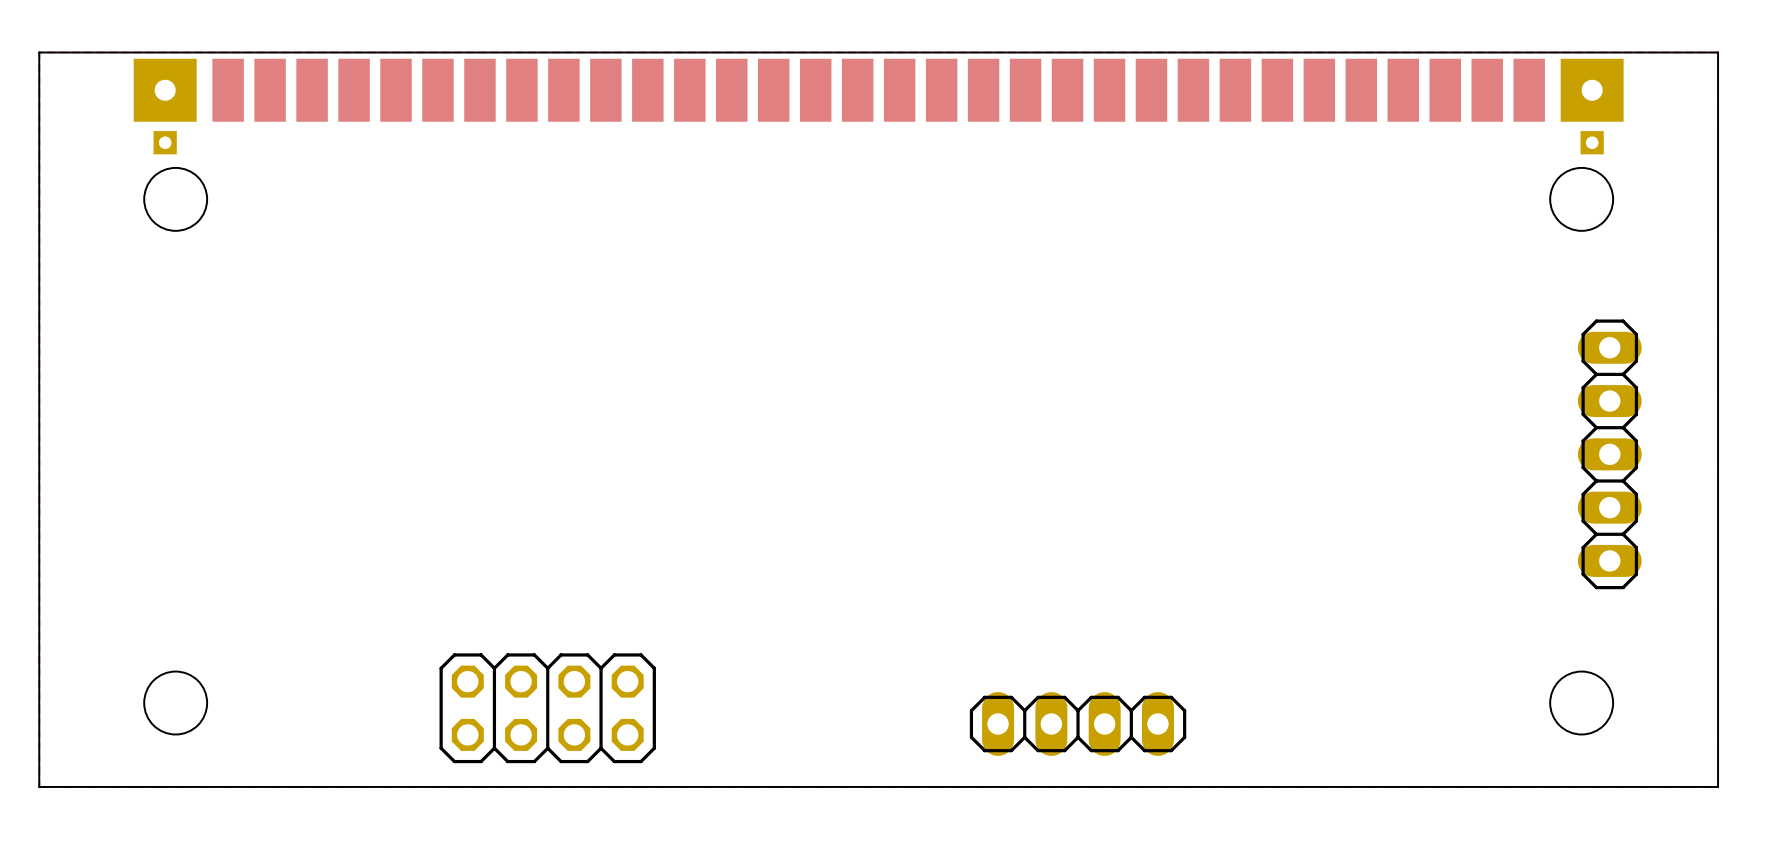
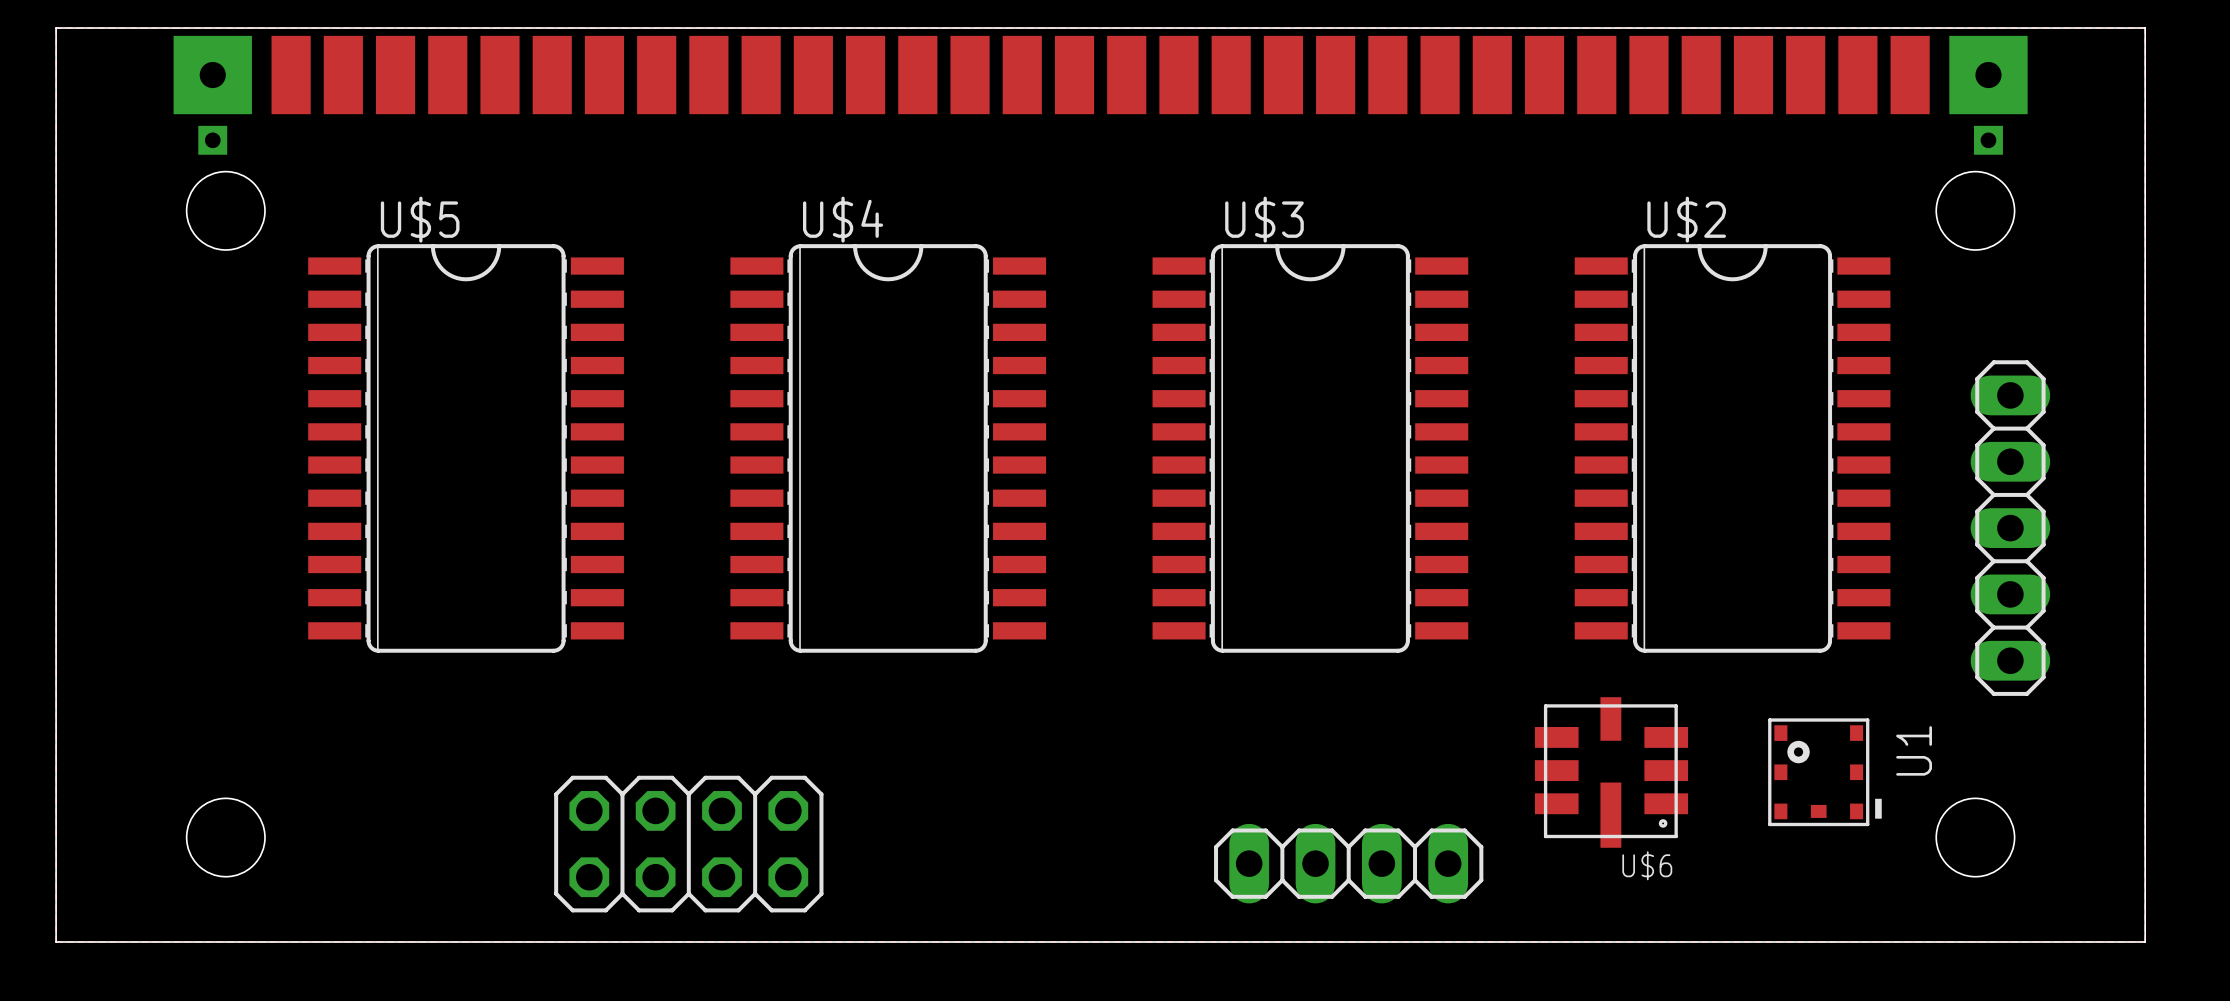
U$5: none -> (466, 448)
U$4: none -> (888, 448)
U$3: none -> (1310, 448)
U$2: none -> (1732, 448)
U$6: none -> (1611, 772)
U1: none -> (1824, 772)

